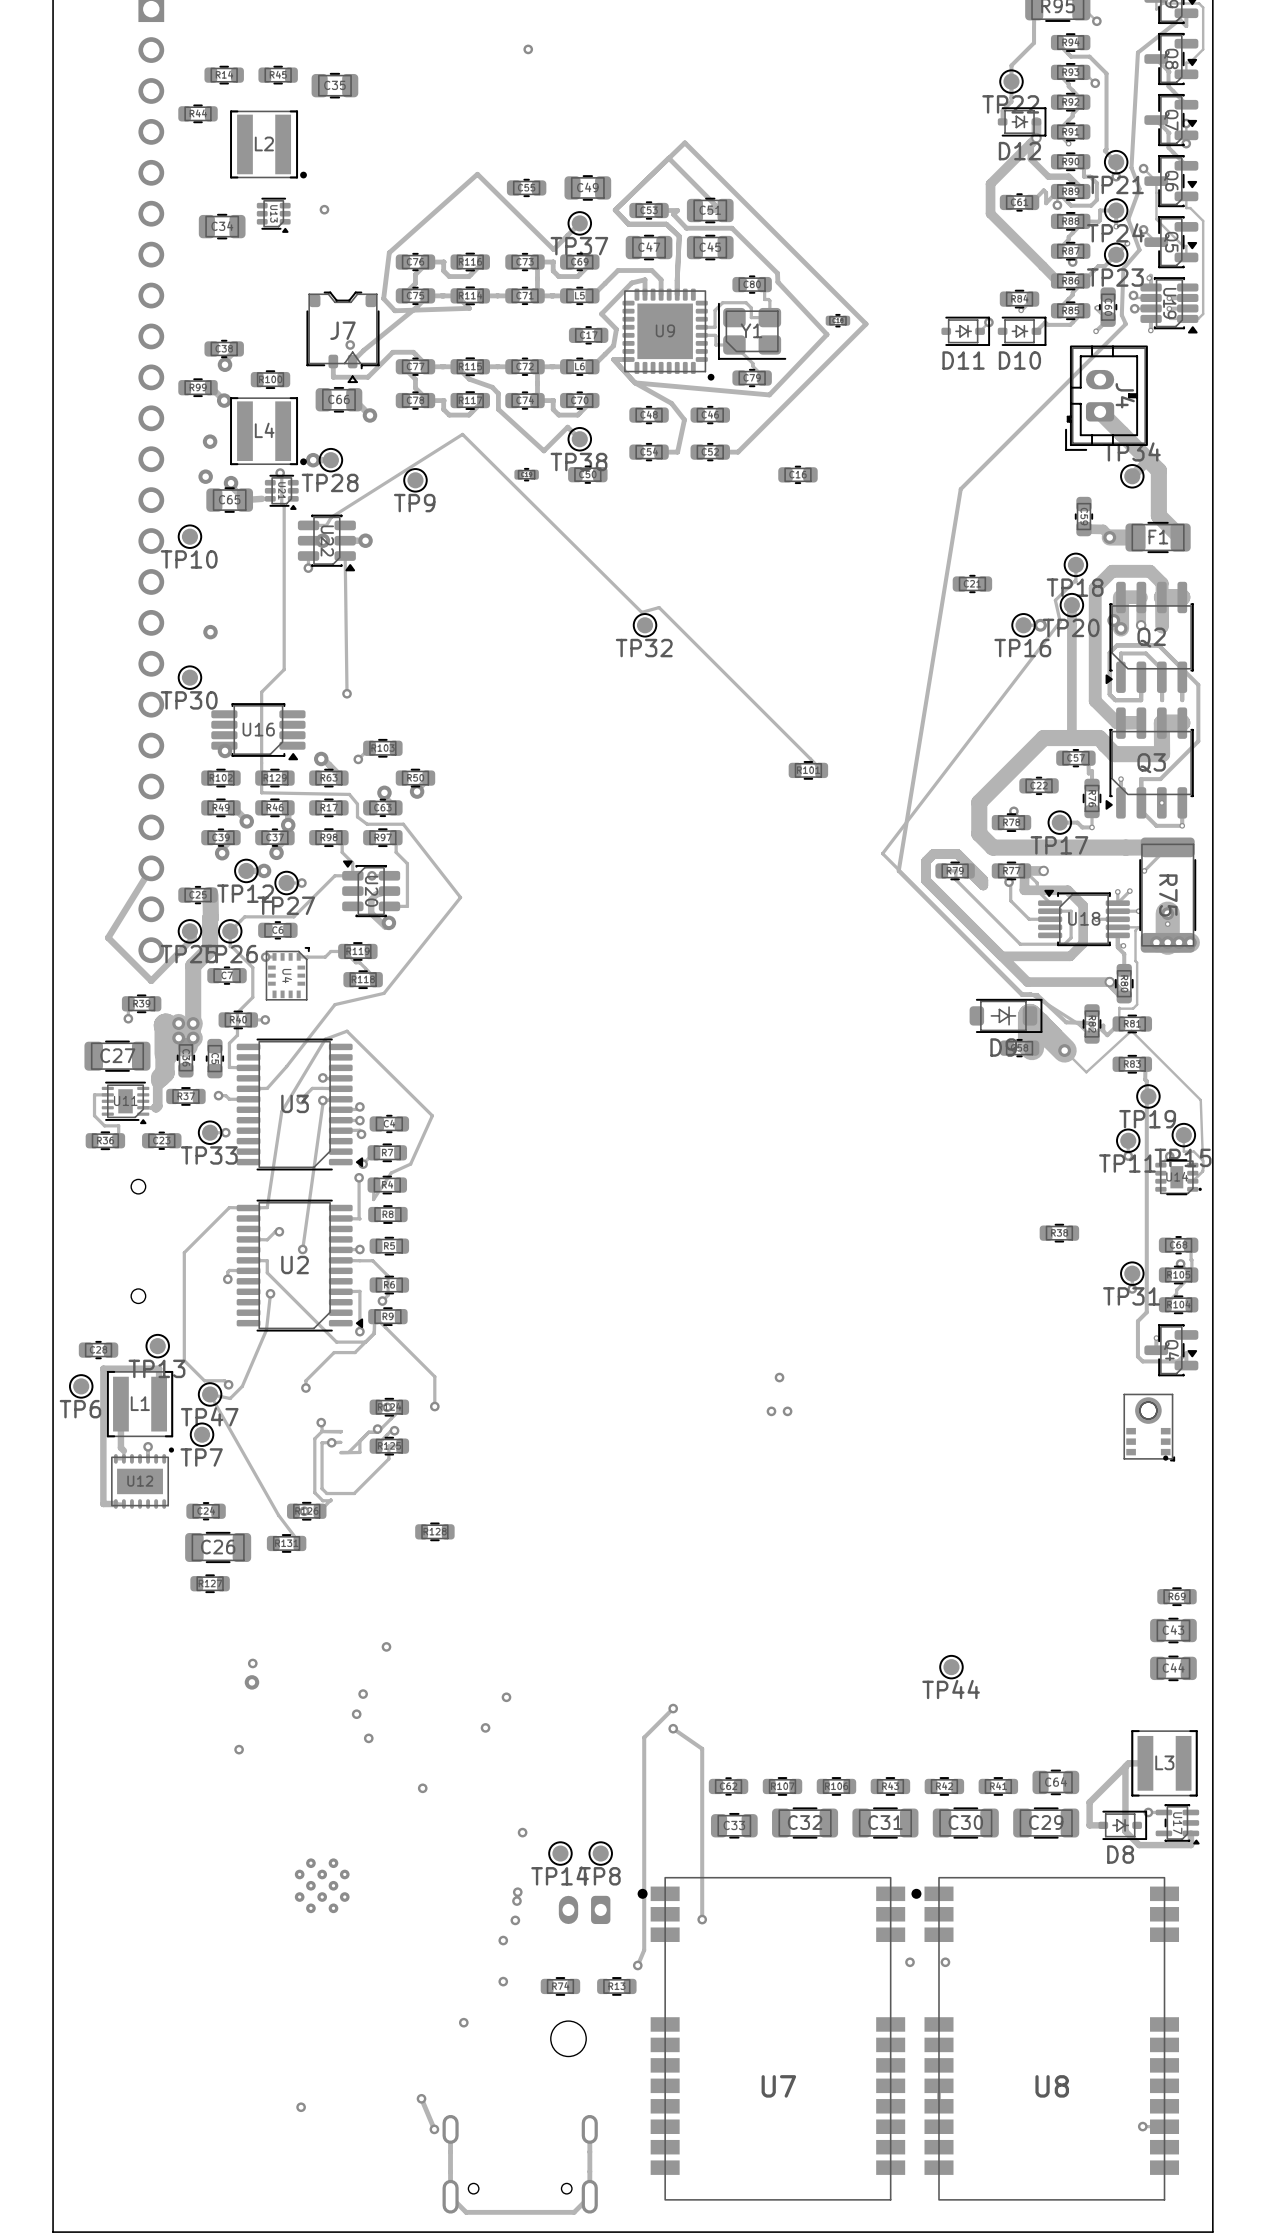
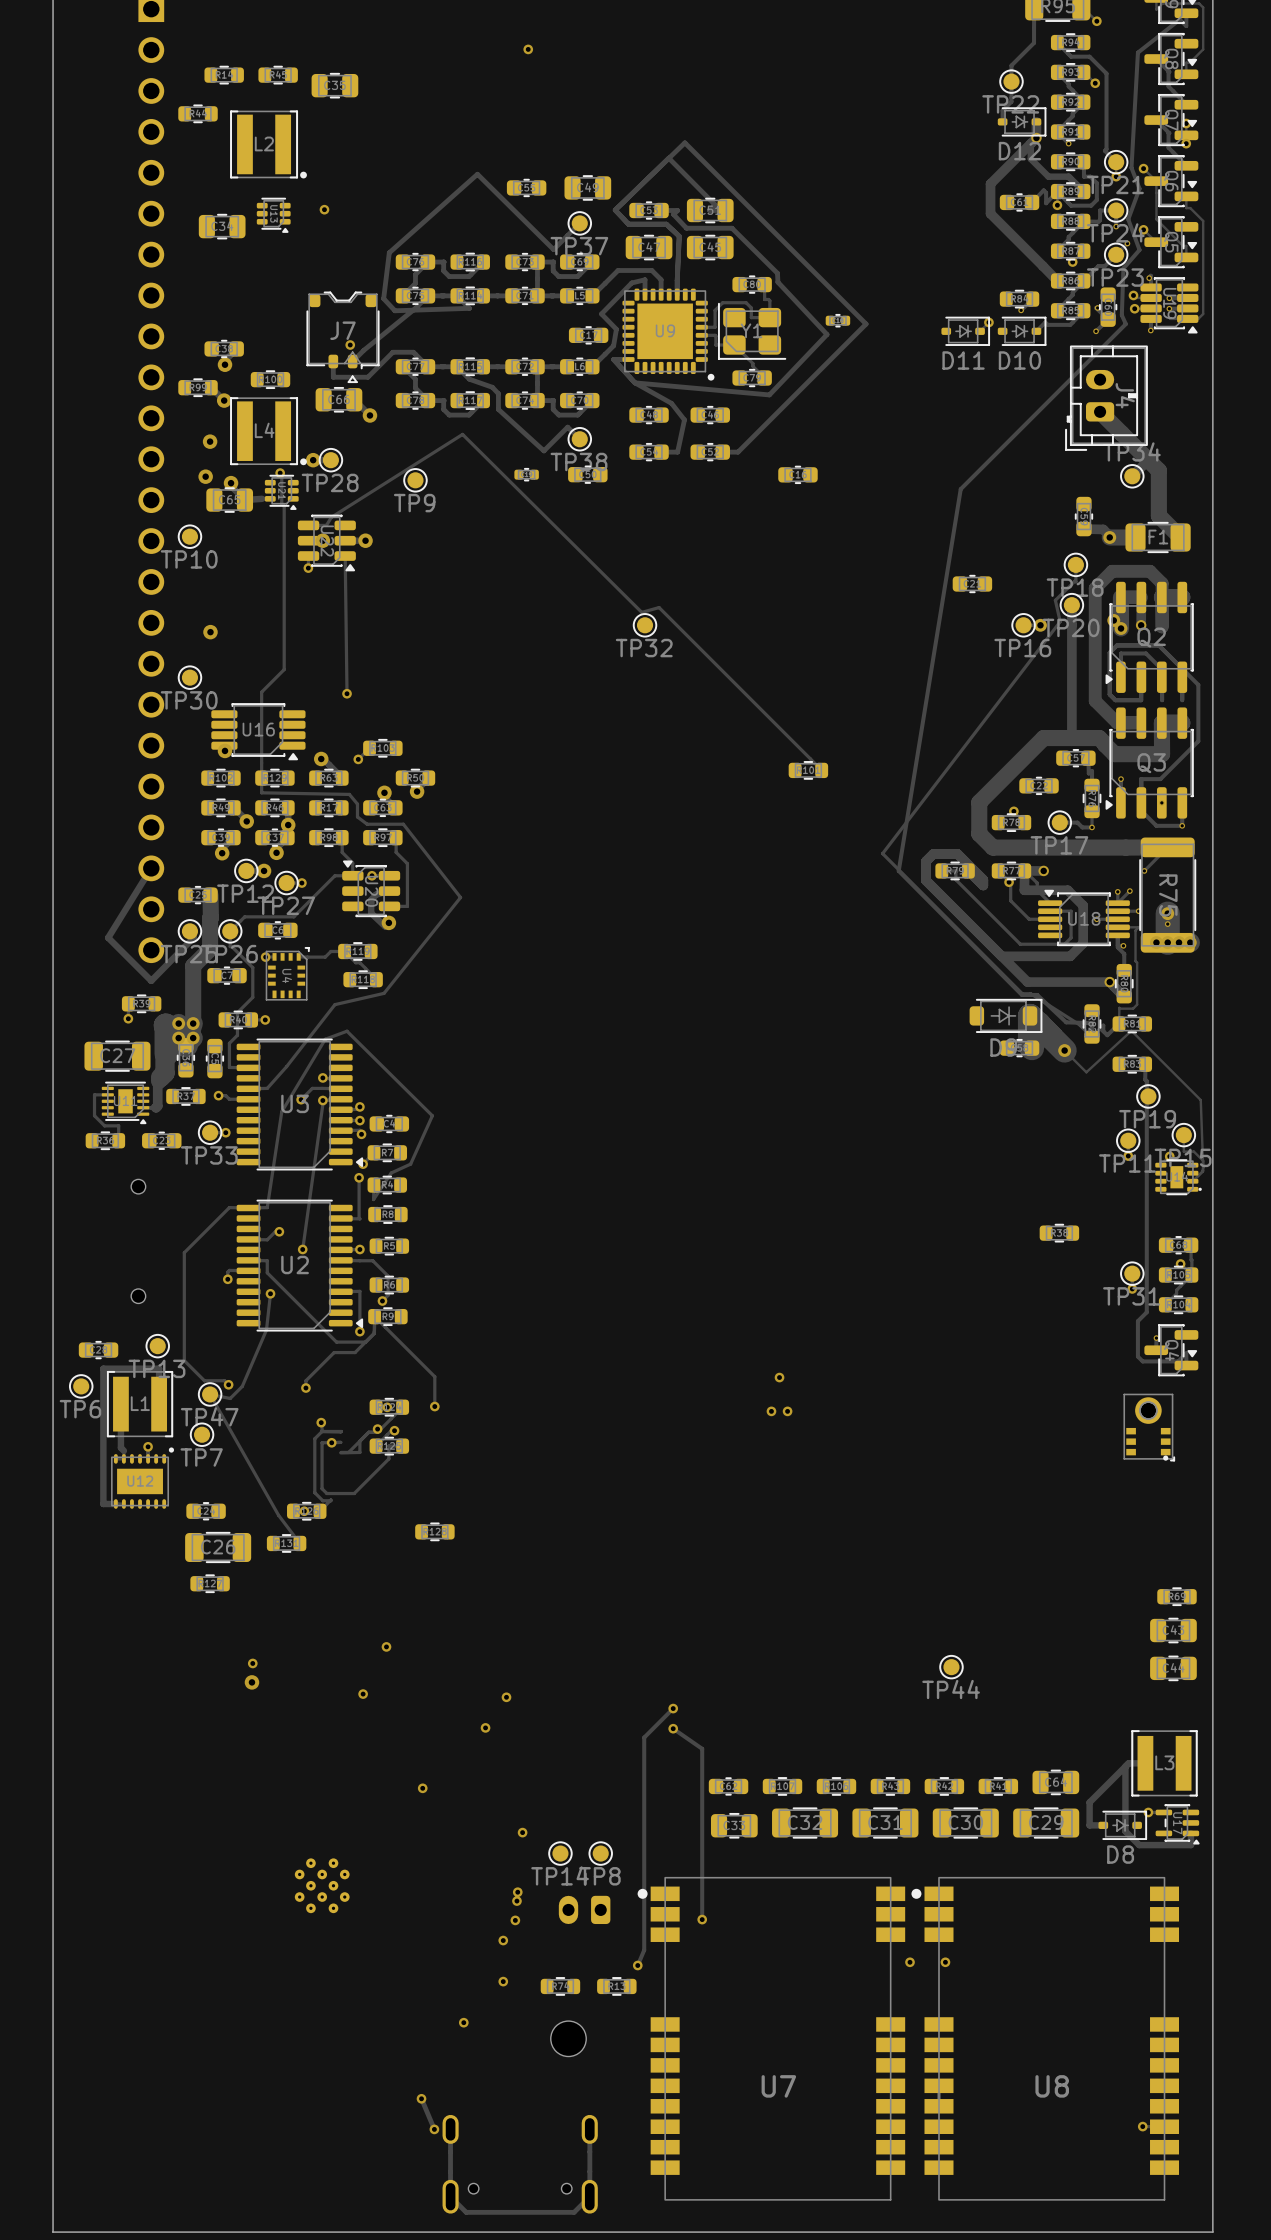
via: (356, 1714) -> none
via: (368, 1738) -> none
via: (239, 1749) -> none
via: (301, 2107) -> none

